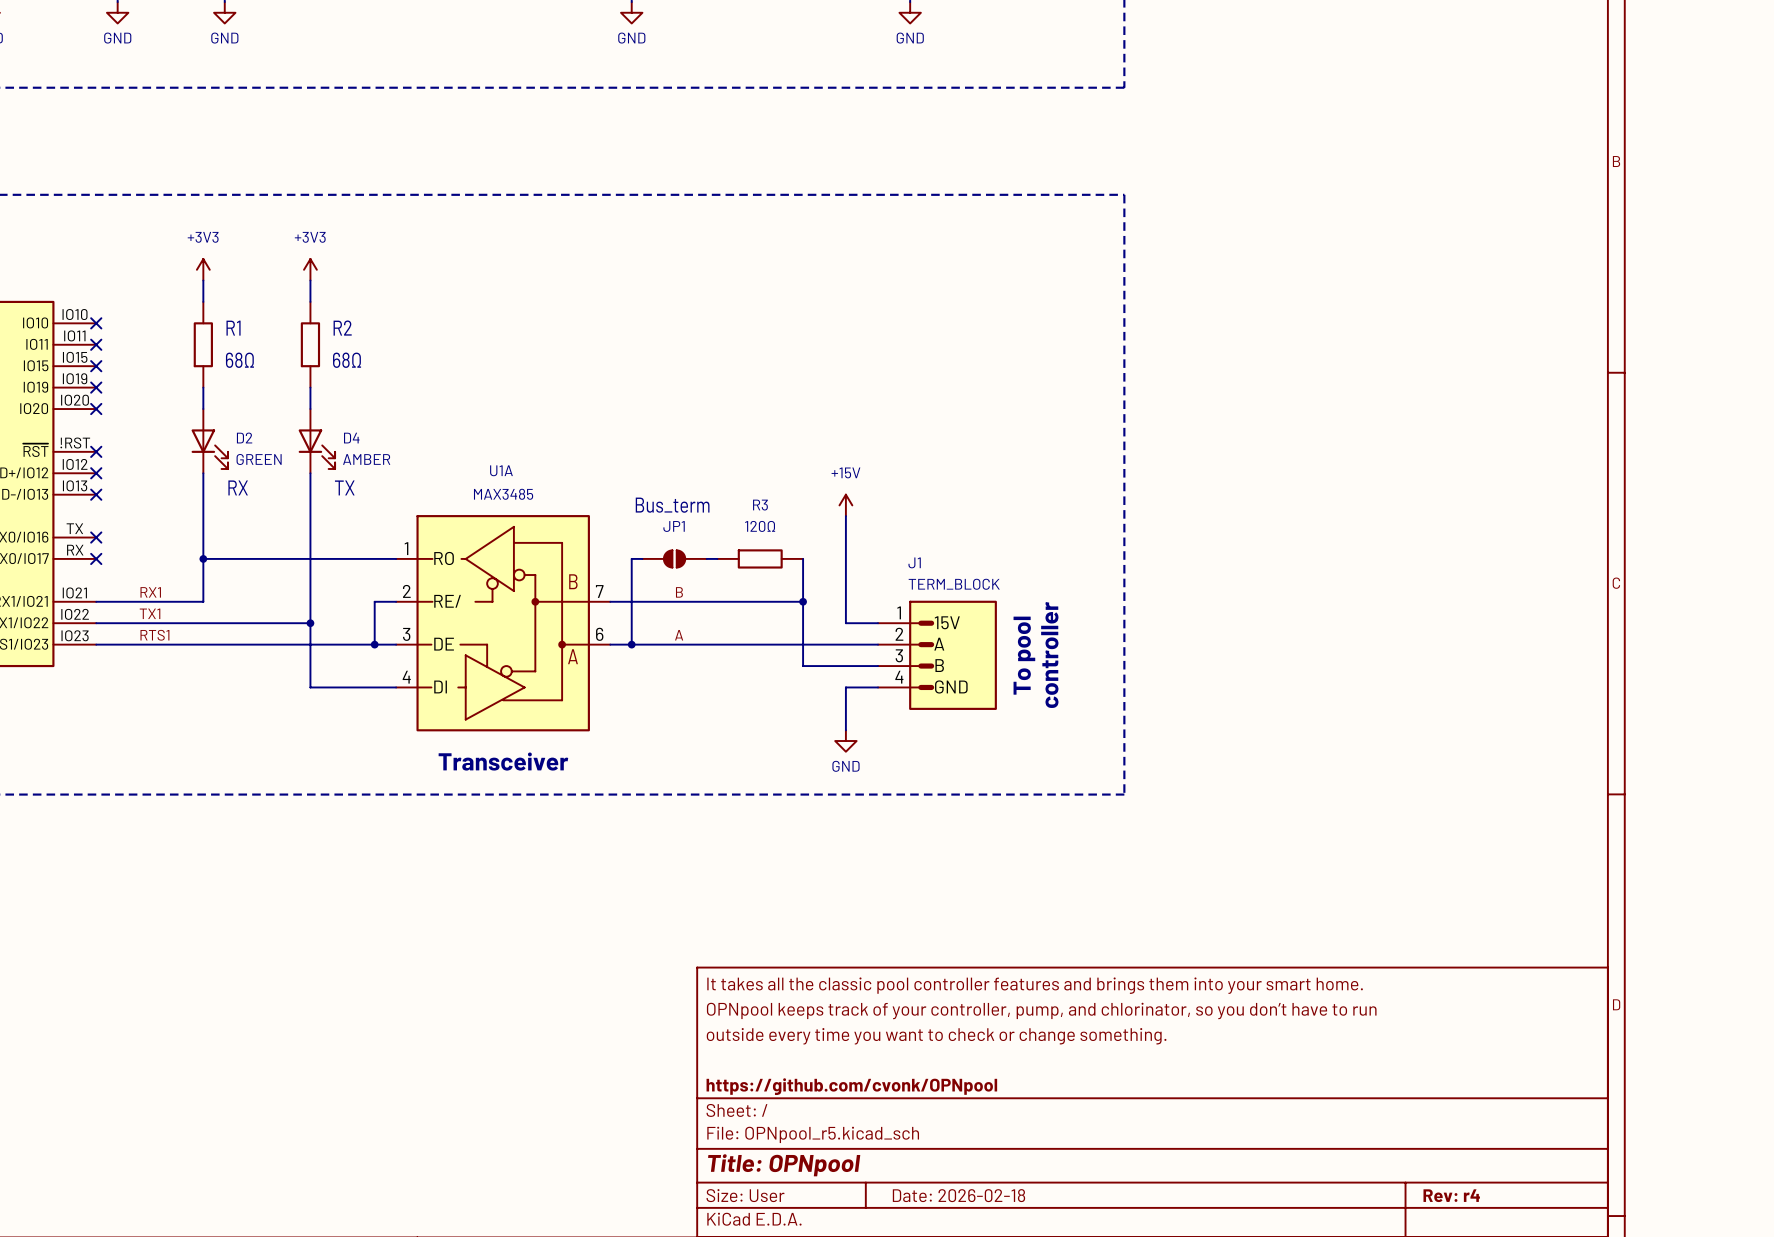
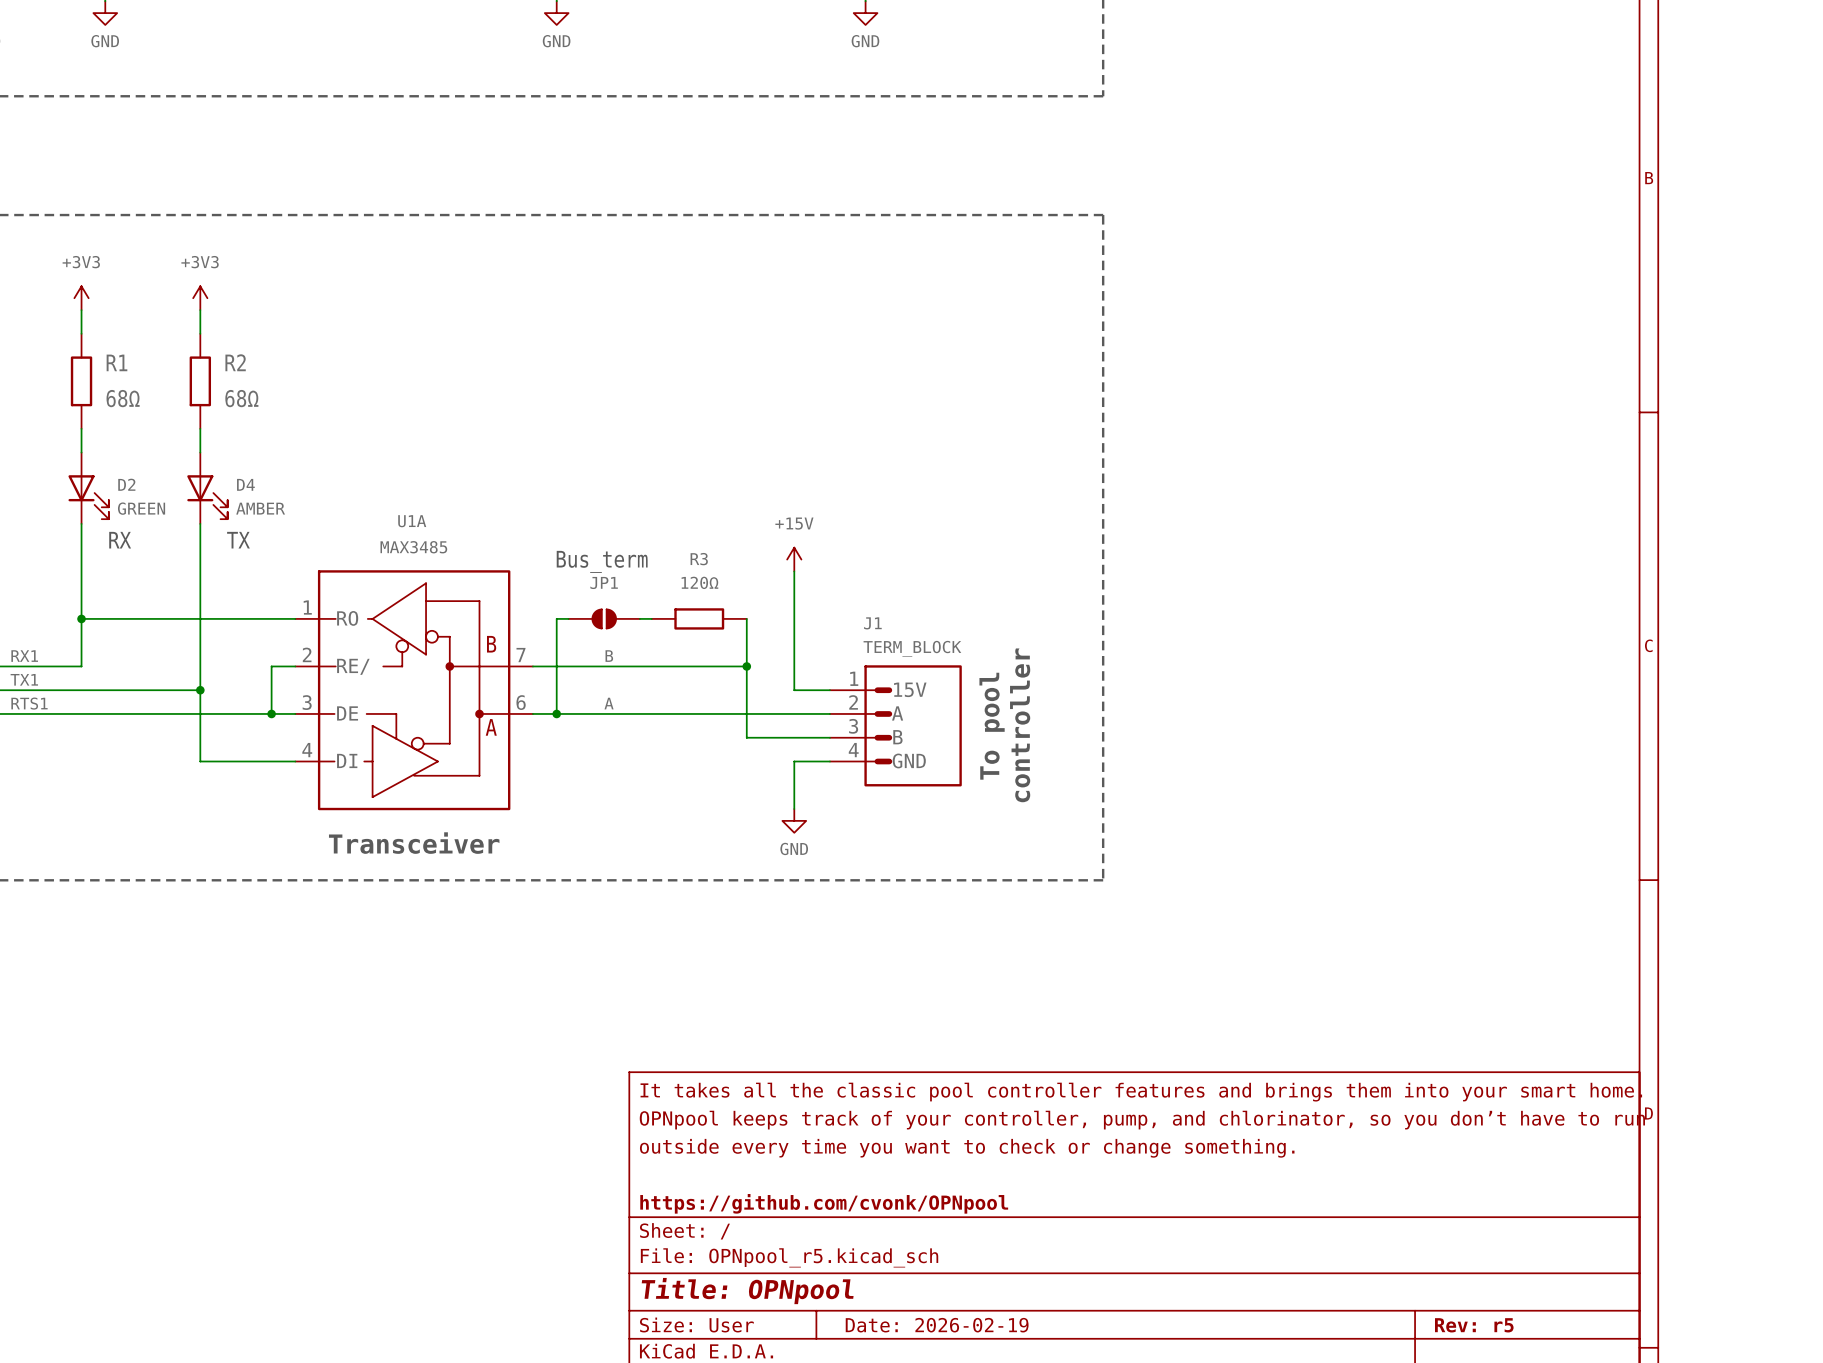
title block: Date: 2026-02-18 (958, 1195) -> Date: 2026-02-19 (937, 1325)
title block: Rev: r4 (1451, 1195) -> Rev: r5 (1474, 1325)

